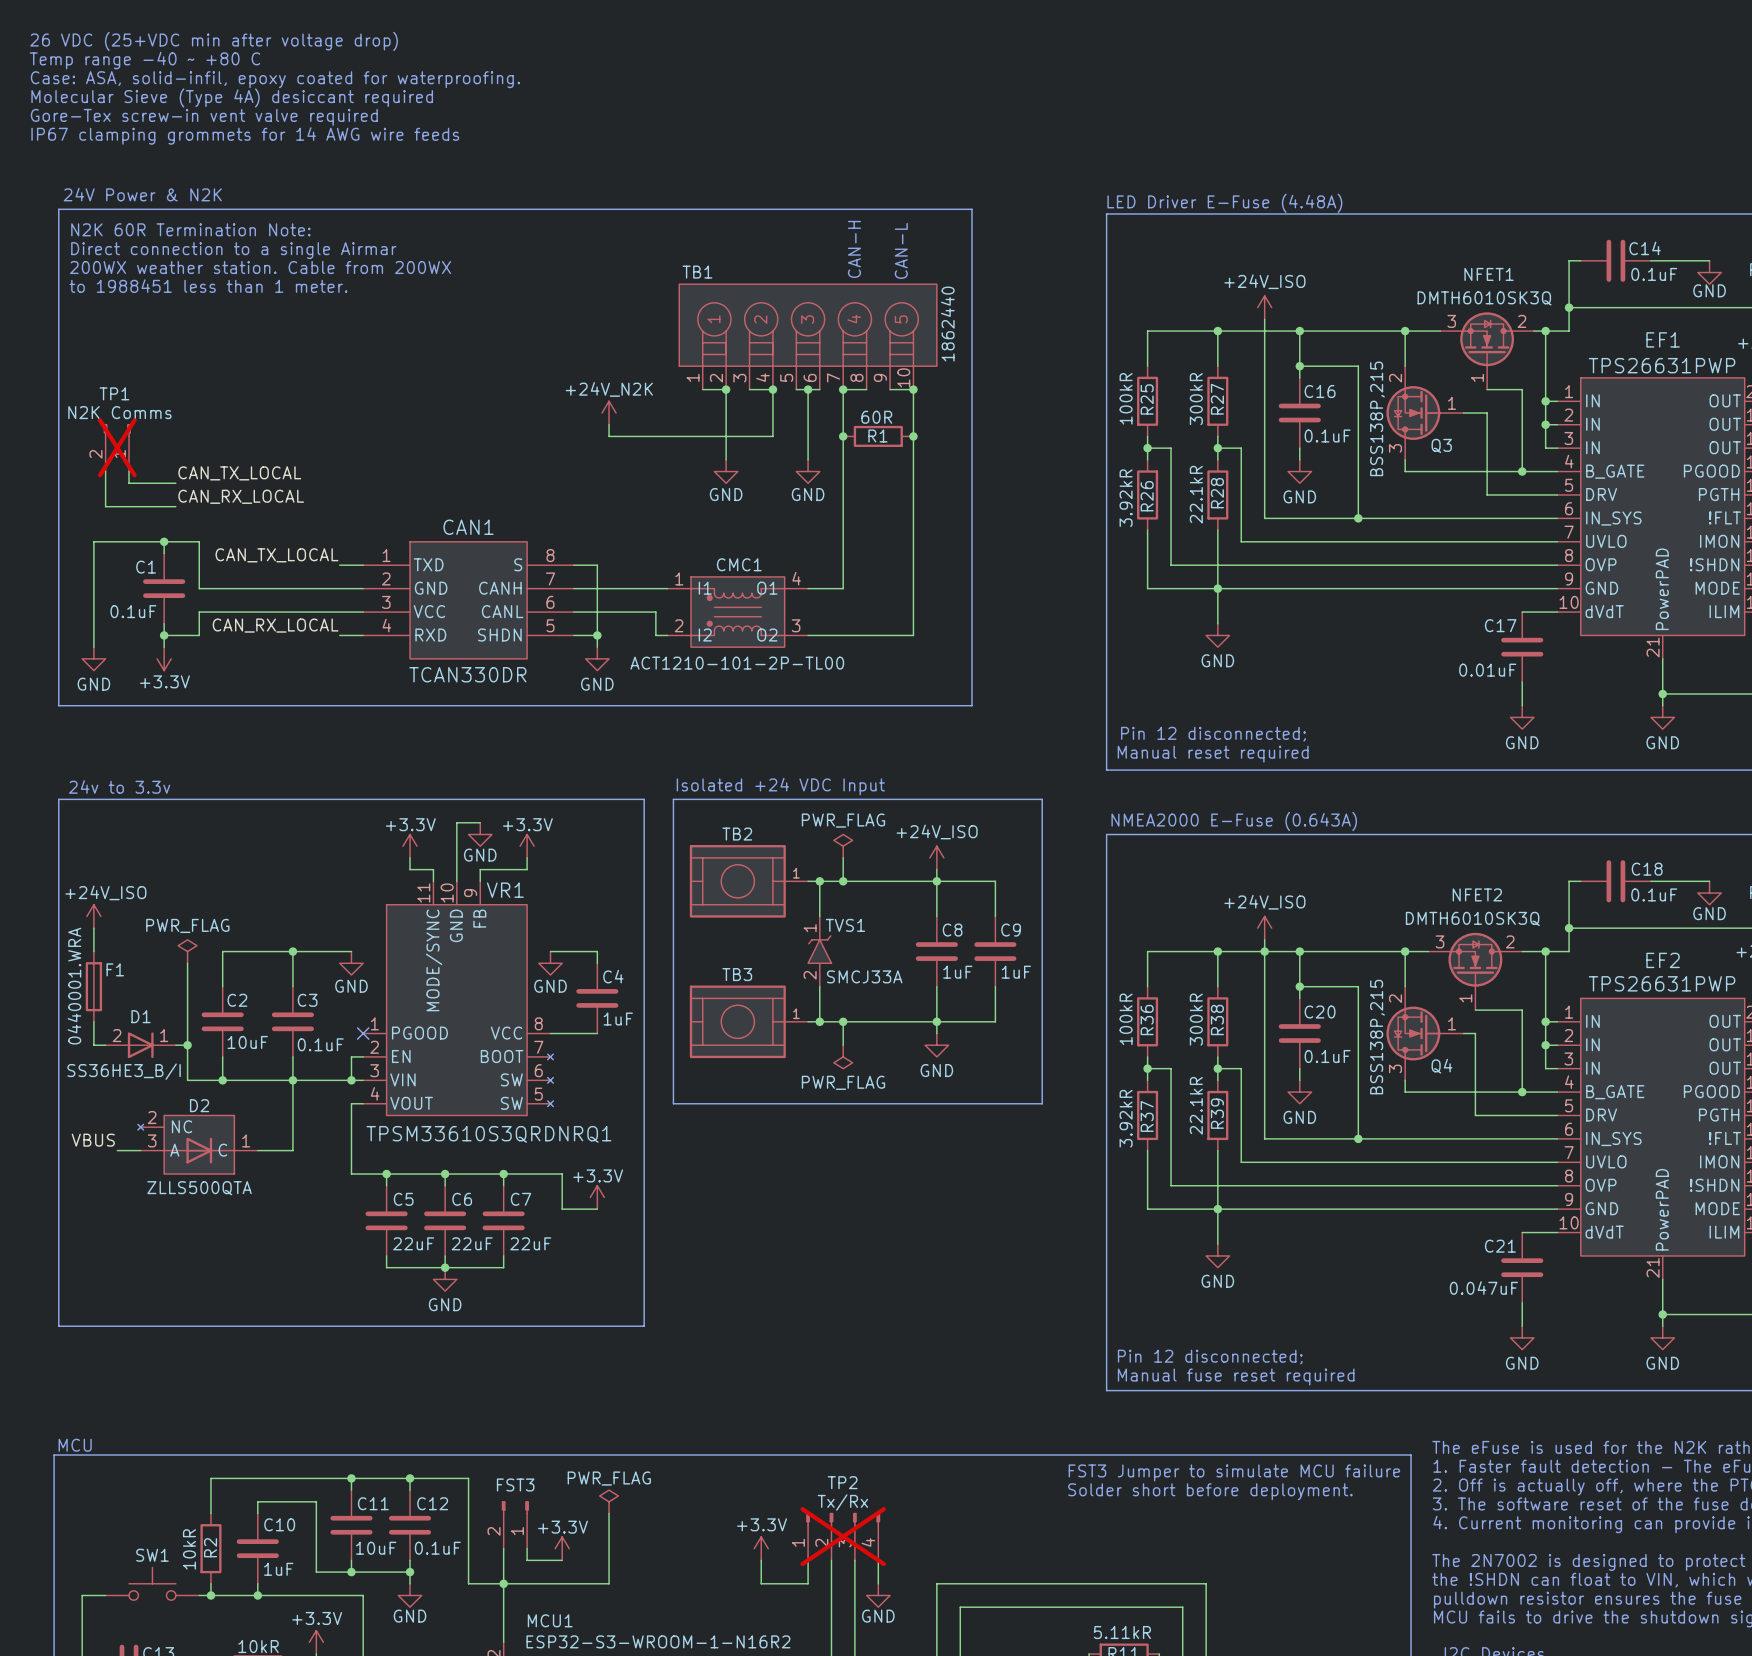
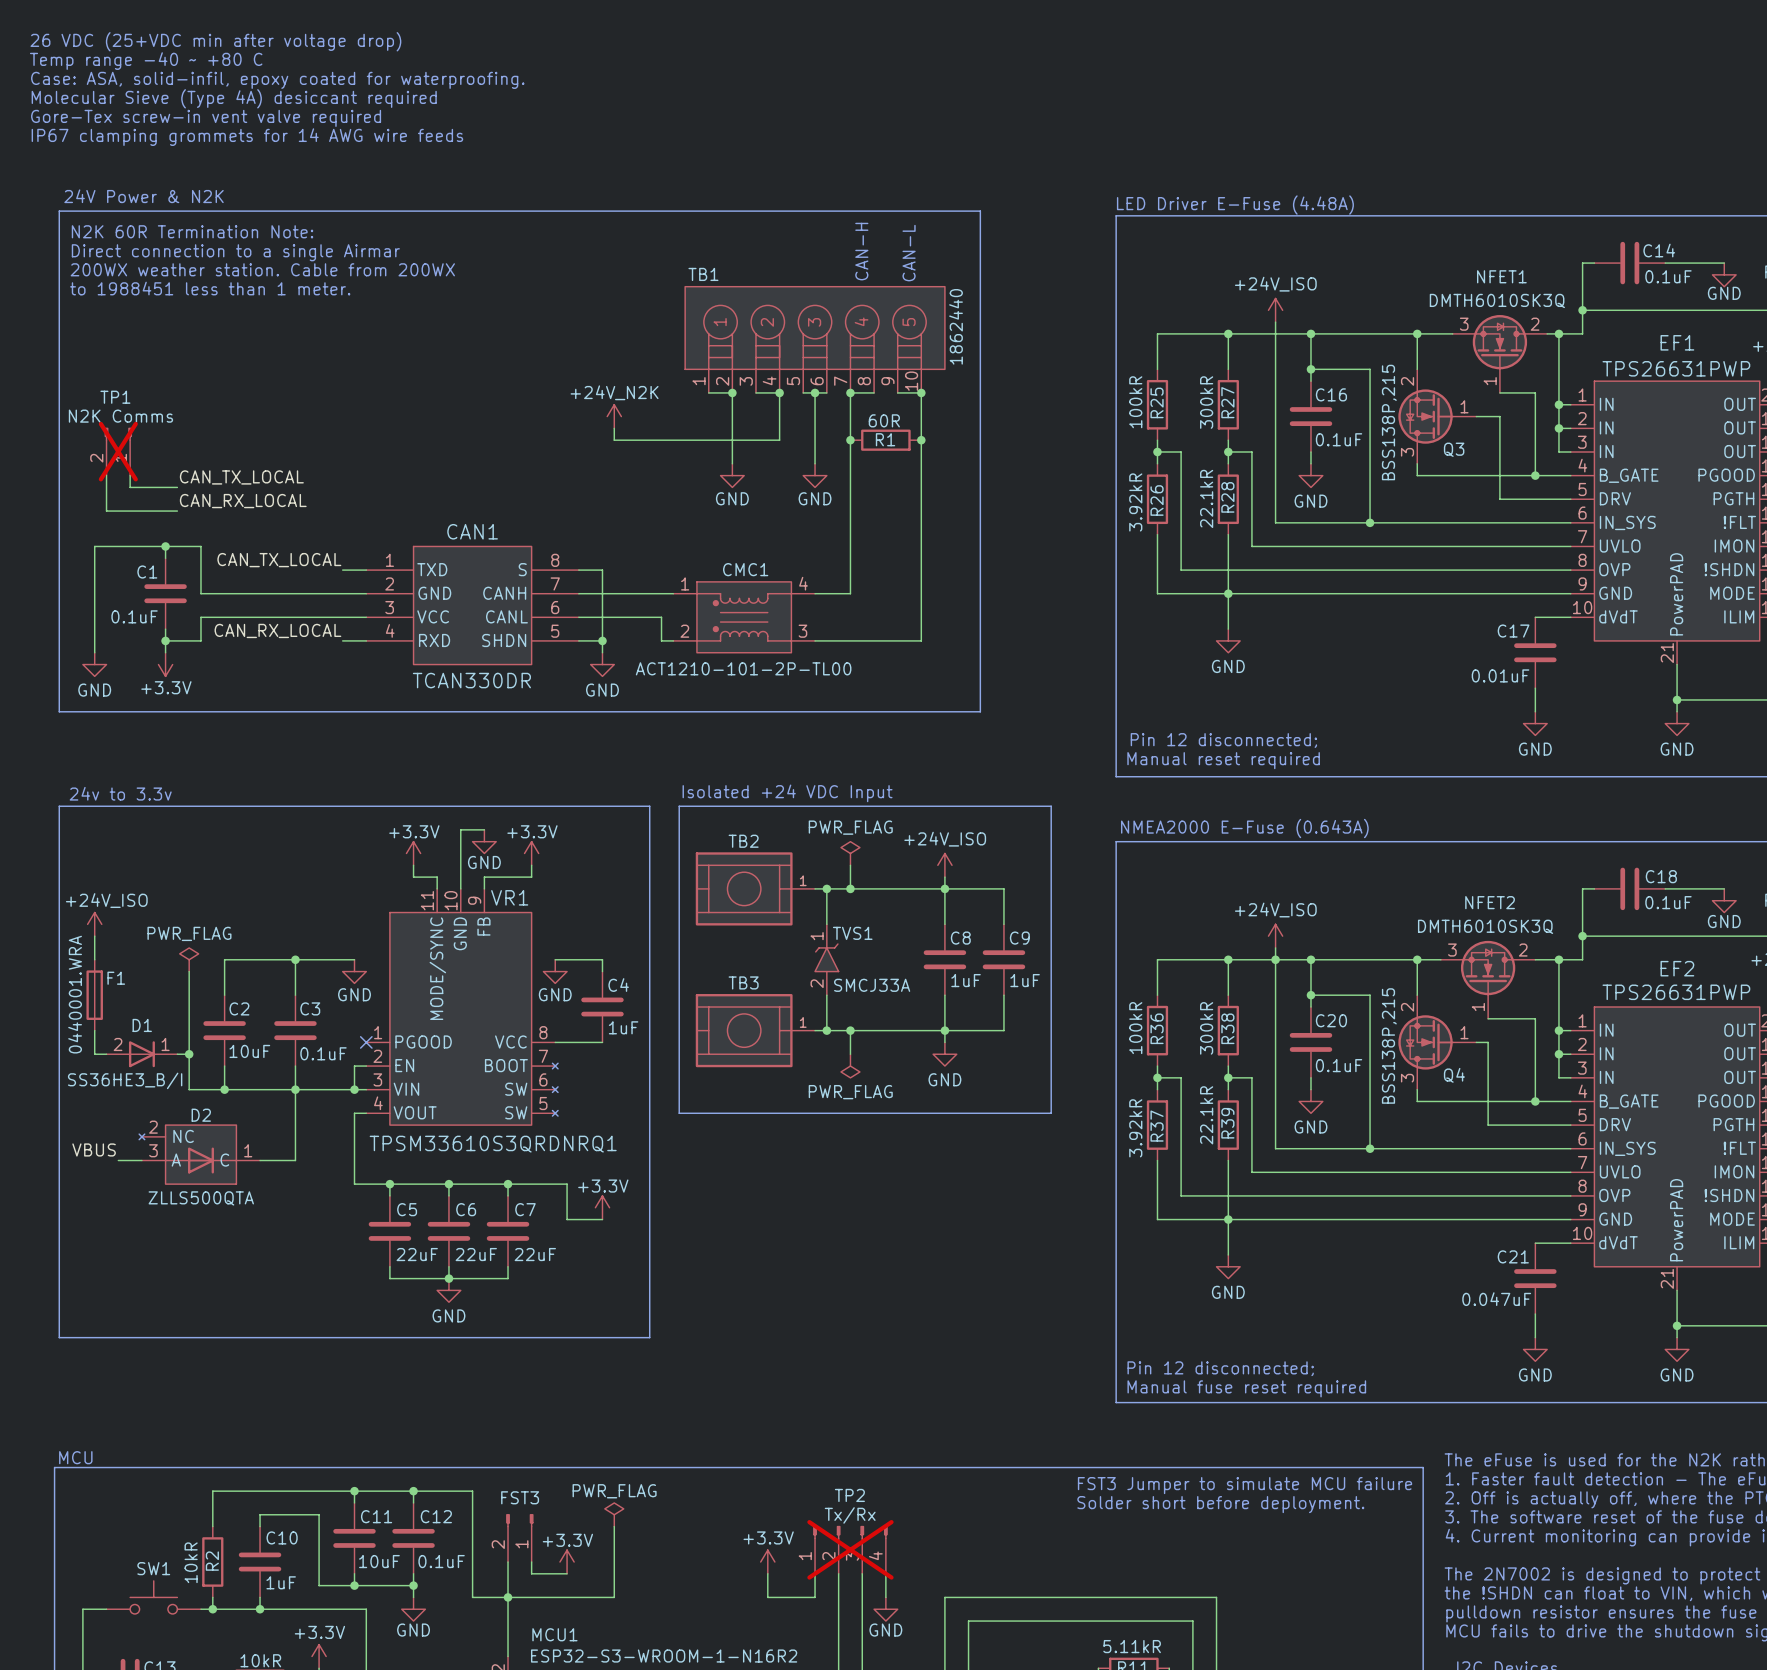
CMC1 pin name: I1 (705, 588) -> none
CMC1 pin name: O1 (767, 588) -> none
CMC1 pin name: I2 (705, 635) -> none
CMC1 pin name: O2 (767, 635) -> none

